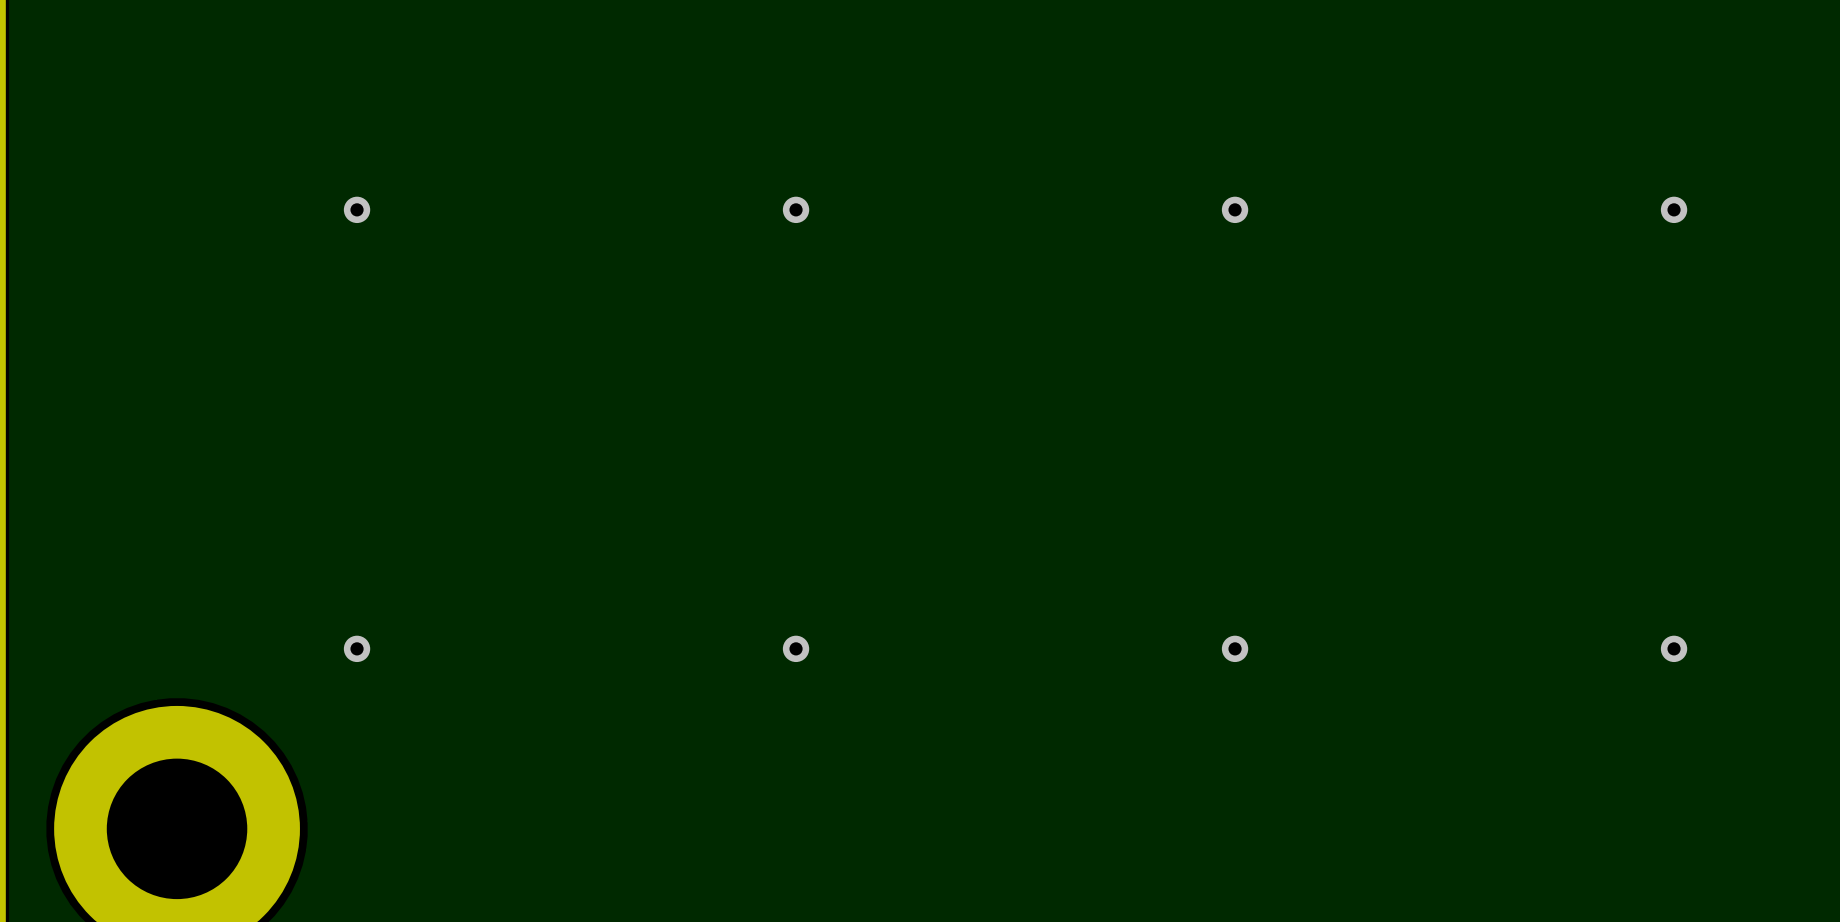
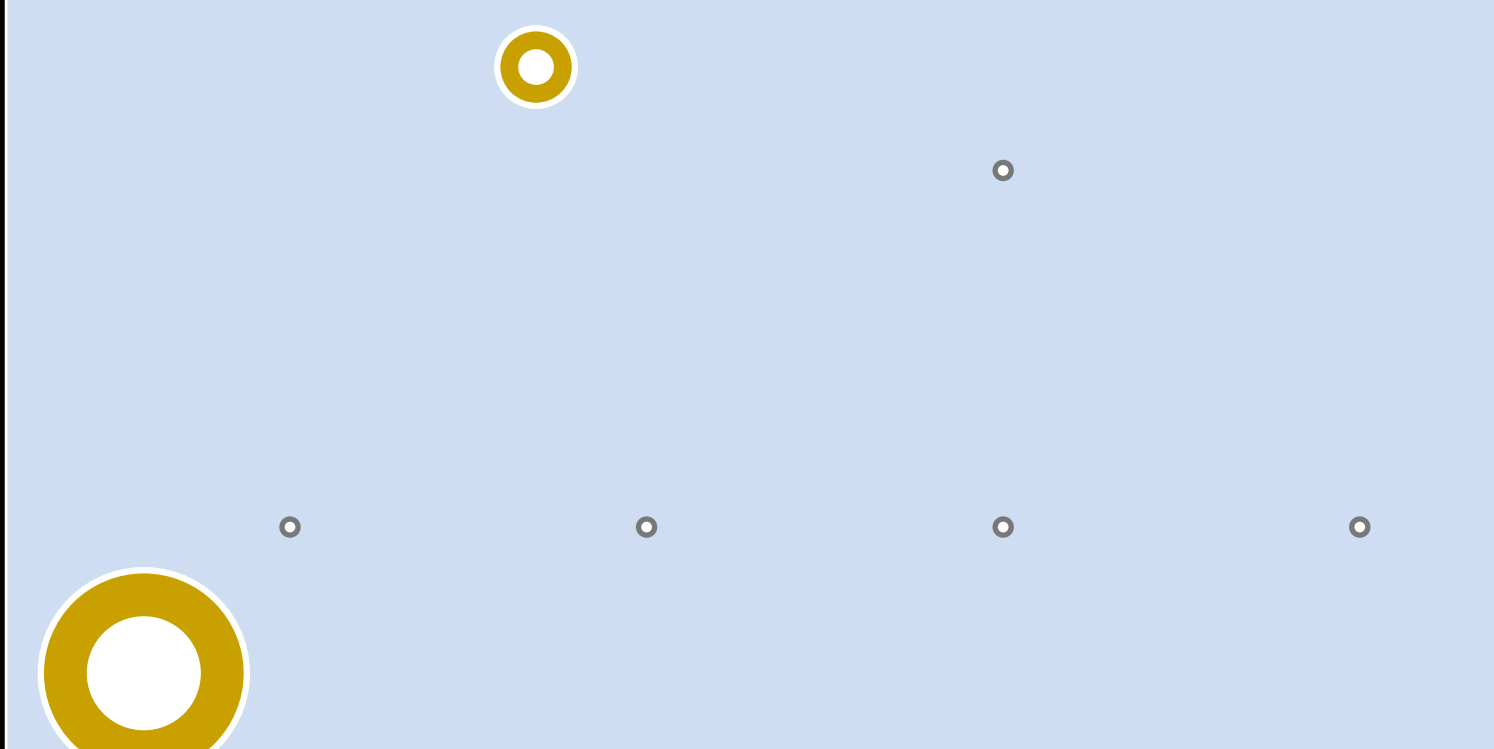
part: none -> (536, 67)
via: (357, 209) -> none
via: (796, 209) -> none
via: (1674, 209) -> none

